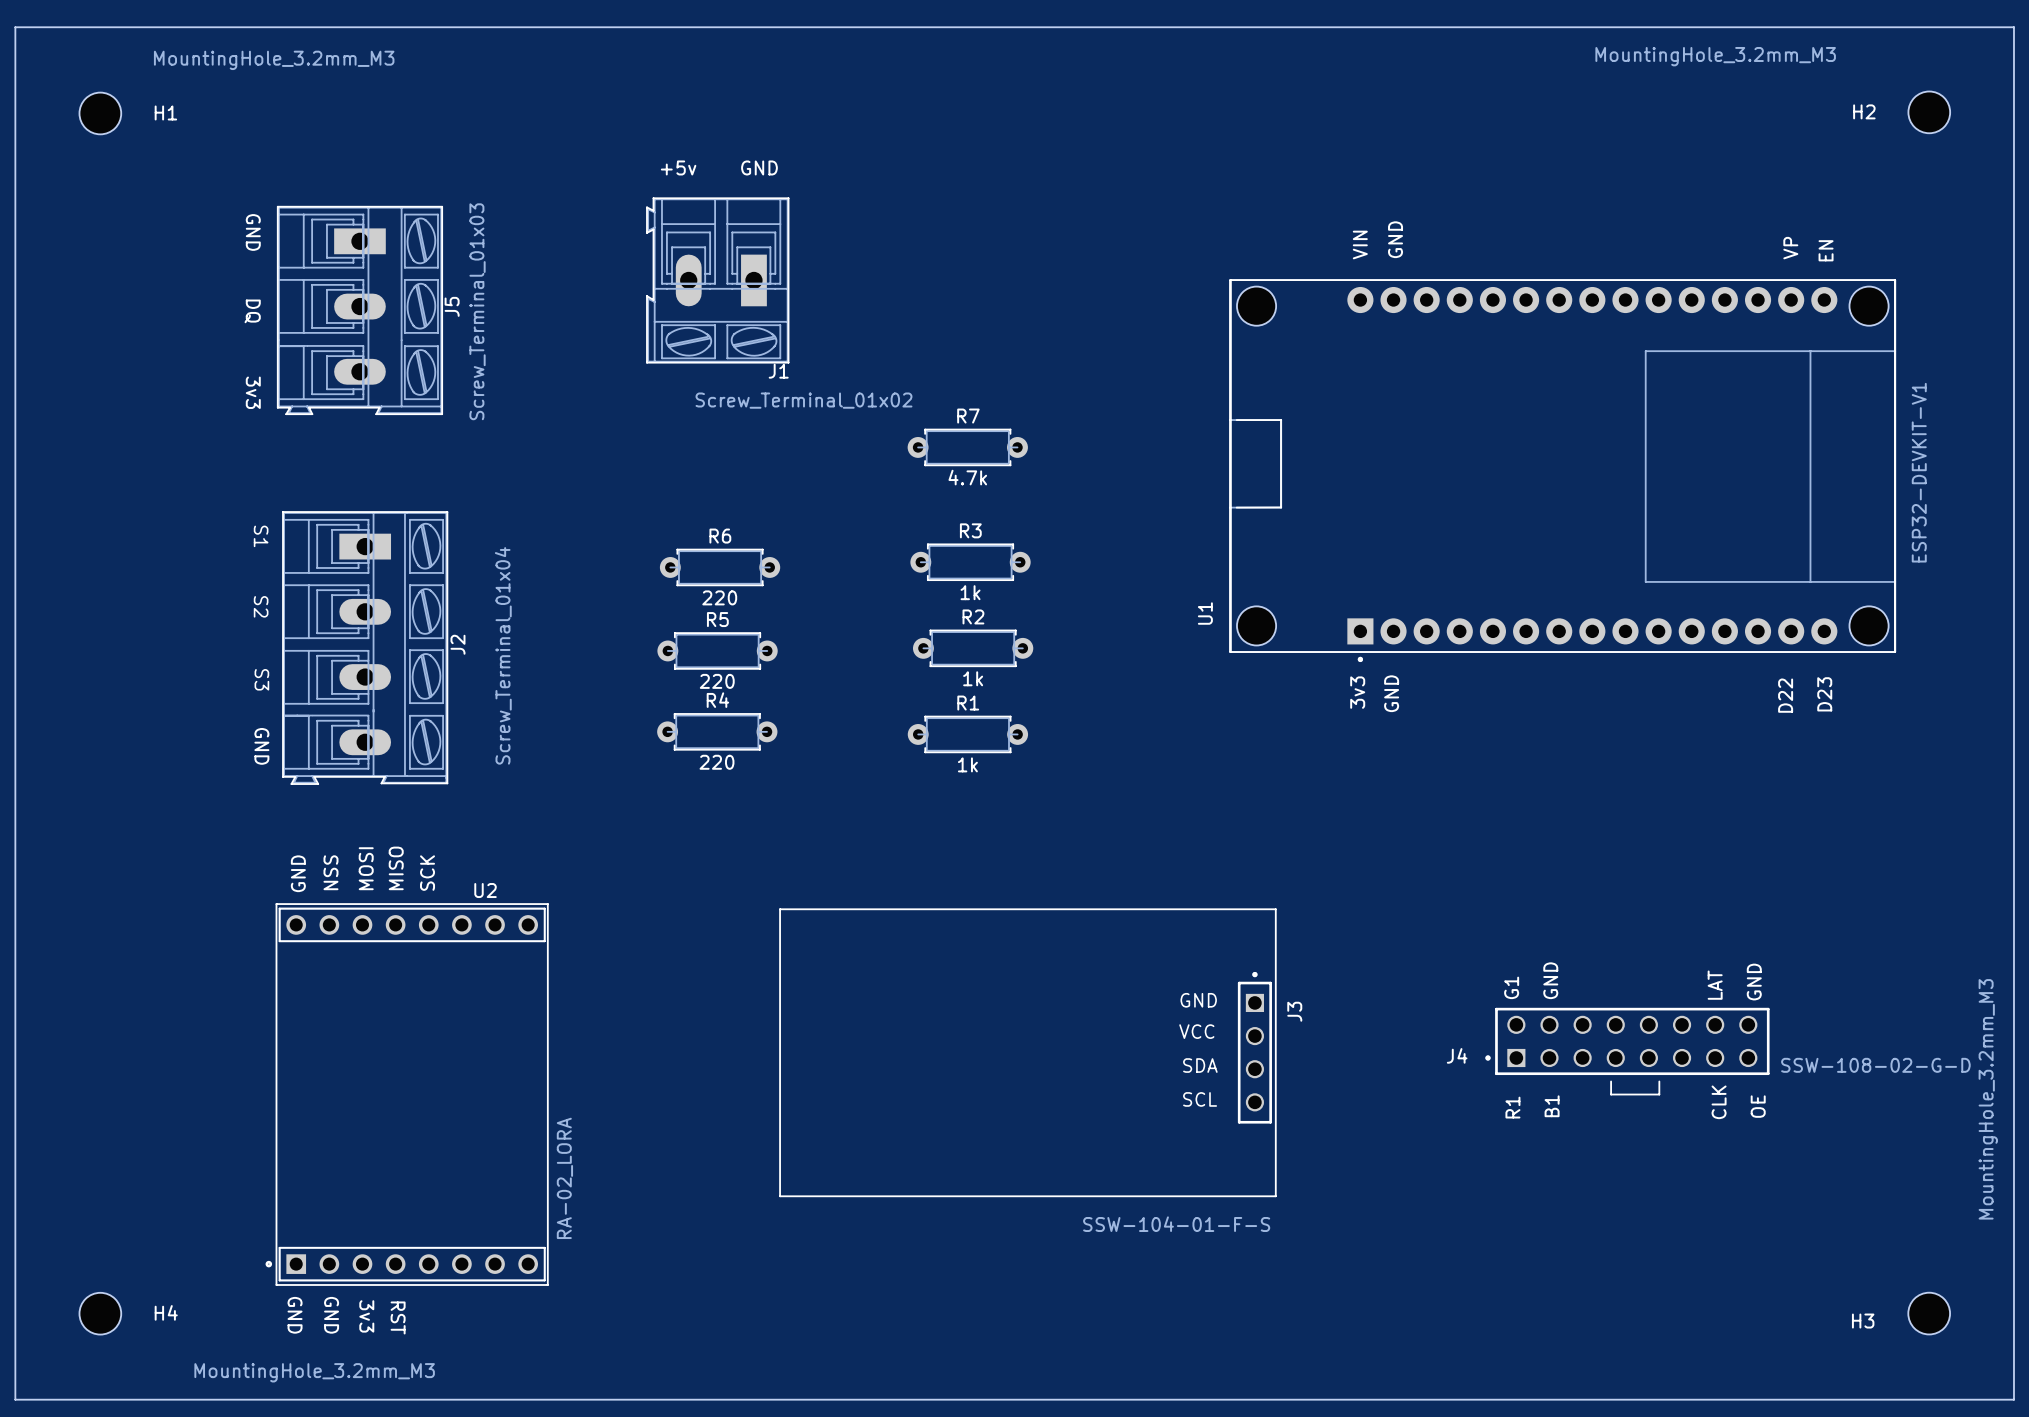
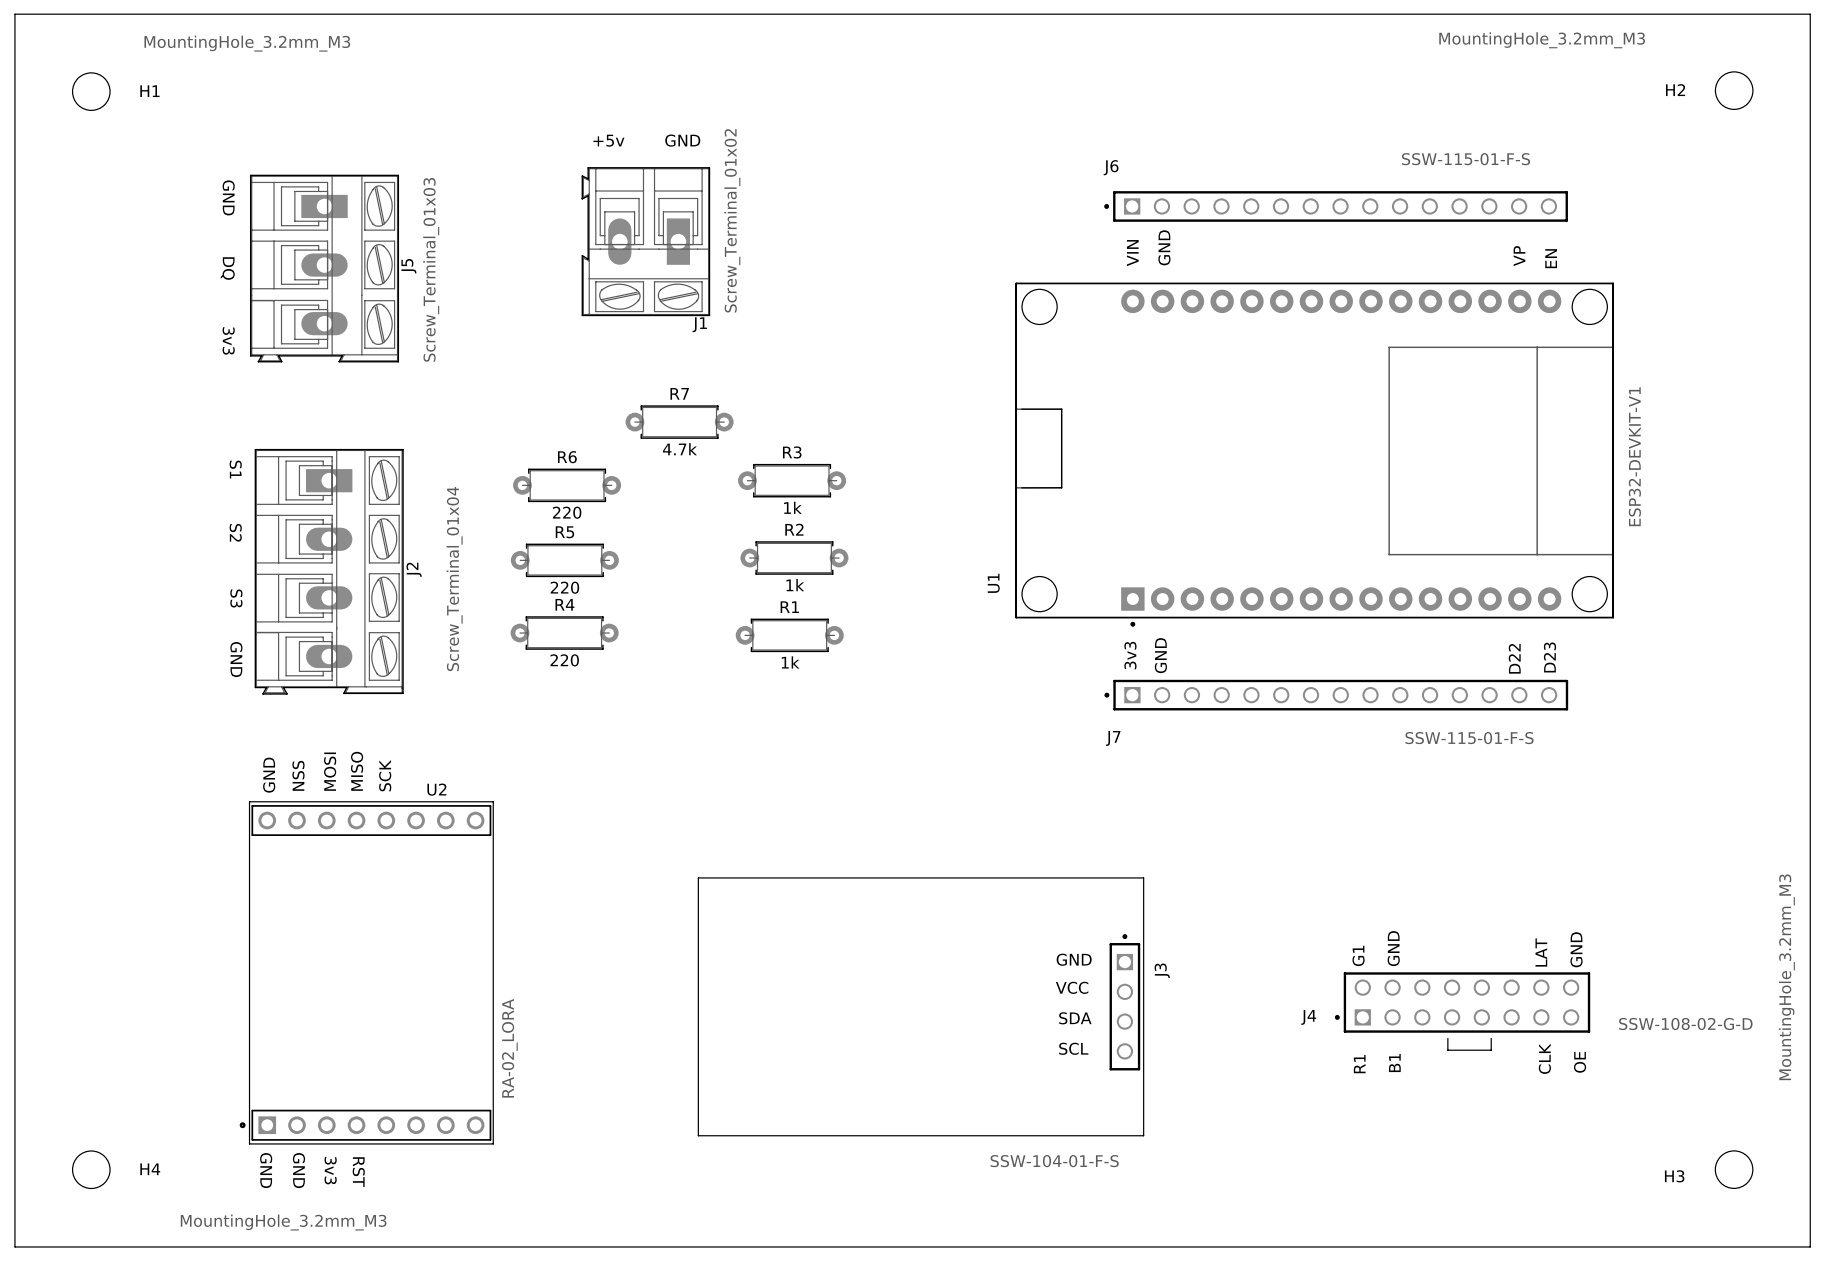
text position: GND (1395, 239) -> GND (1164, 247)
J6: none -> SSW-115-01-F-S (1336, 206)
text position: VIN (1360, 245) -> VIN (1132, 253)
text position: VP (1790, 248) -> VP (1519, 256)
text position: EN (1826, 250) -> EN (1551, 258)
J1 value rotation: 0° (803, 400) -> 90° counterclockwise (732, 220)
line: (1236, 420) (1281, 420) (1281, 507) (1236, 507) -> (1021, 409) (1061, 409) (1061, 487) (1021, 487)
R7 position: (967, 447) -> (679, 422)
U1 position: (1562, 470) -> (1314, 454)
R3 position: (970, 562) -> (792, 480)
R6 position: (720, 567) -> (567, 485)
R2 position: (973, 648) -> (794, 558)
R5 position: (717, 650) -> (564, 560)
text position: 3v3 (1357, 692) -> 3v3 (1130, 655)
text position: GND (1391, 693) -> GND (1160, 655)
text position: D23 (1824, 694) -> D23 (1549, 657)
text position: D22 (1785, 695) -> D22 (1514, 658)
R4 position: (717, 731) -> (564, 633)
R1 position: (967, 734) -> (789, 635)
J7: none -> SSW-115-01-F-S (1336, 695)
line: (780, 909) (1275, 909) (1275, 1196) (780, 1196) (780, 909) -> (698, 877) (1143, 877) (1143, 1135) (698, 1135) (698, 877)
text position: GND (1550, 980) -> GND (1393, 948)
text position: GND (1754, 982) -> GND (1576, 949)
text position: LAT (1715, 985) -> LAT (1541, 952)
text position: G1 (1511, 987) -> G1 (1358, 955)
text position: GND (1198, 1000) -> GND (1074, 959)
text position: VCC (1196, 1031) -> VCC (1072, 987)
J4 position: (1627, 1041) -> (1462, 1002)
J3 position: (1254, 1047) -> (1124, 1002)
text position: SDA (1200, 1065) -> SDA (1075, 1018)
line: (1611, 1081) (1611, 1094) (1659, 1094) (1659, 1081) -> (1447, 1038) (1447, 1050) (1491, 1050) (1491, 1038)
text position: SCL (1200, 1099) -> SCL (1073, 1048)
text position: CLK (1719, 1102) -> CLK (1544, 1058)
text position: B1 (1552, 1106) -> B1 (1394, 1062)
text position: OE (1758, 1106) -> OE (1580, 1062)
text position: R1 (1512, 1107) -> R1 (1359, 1064)

